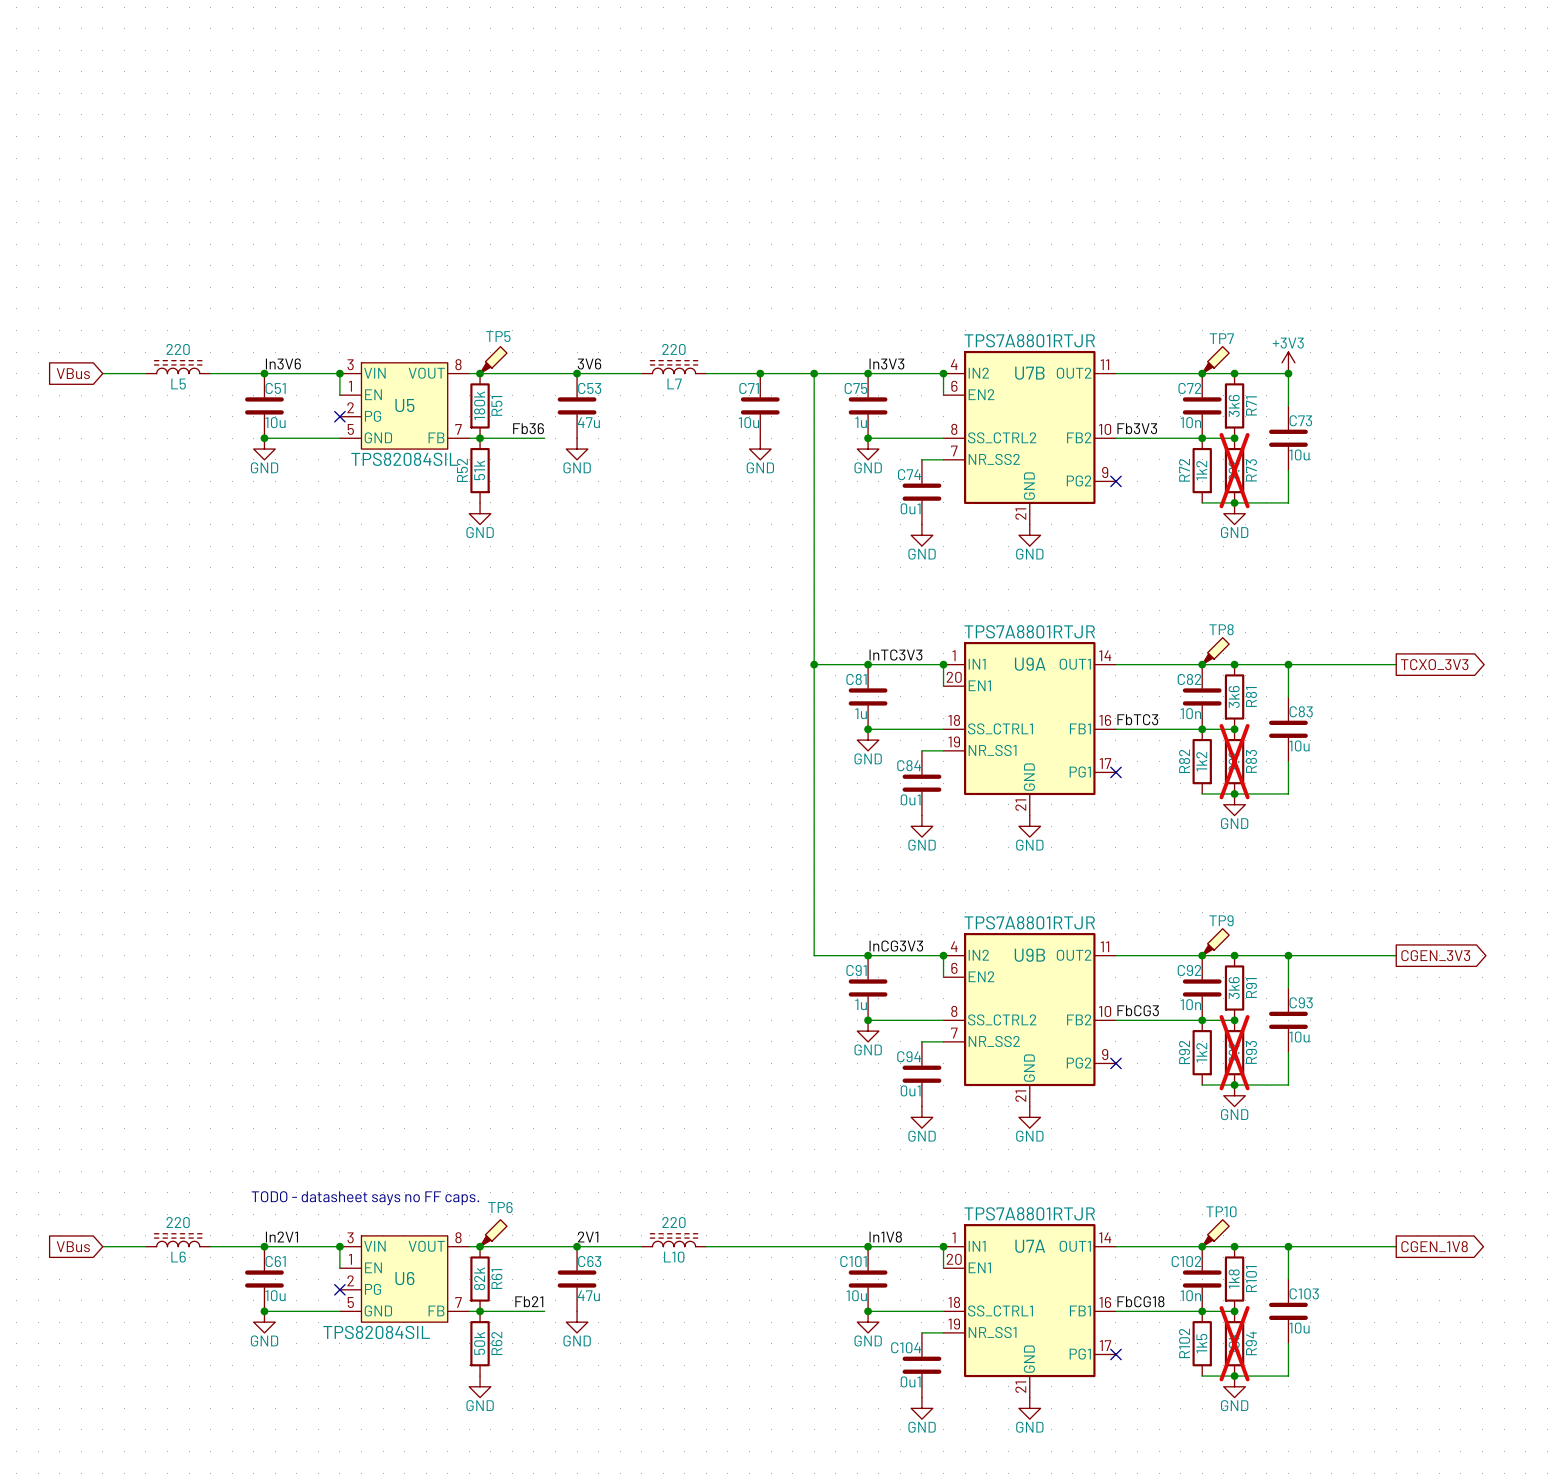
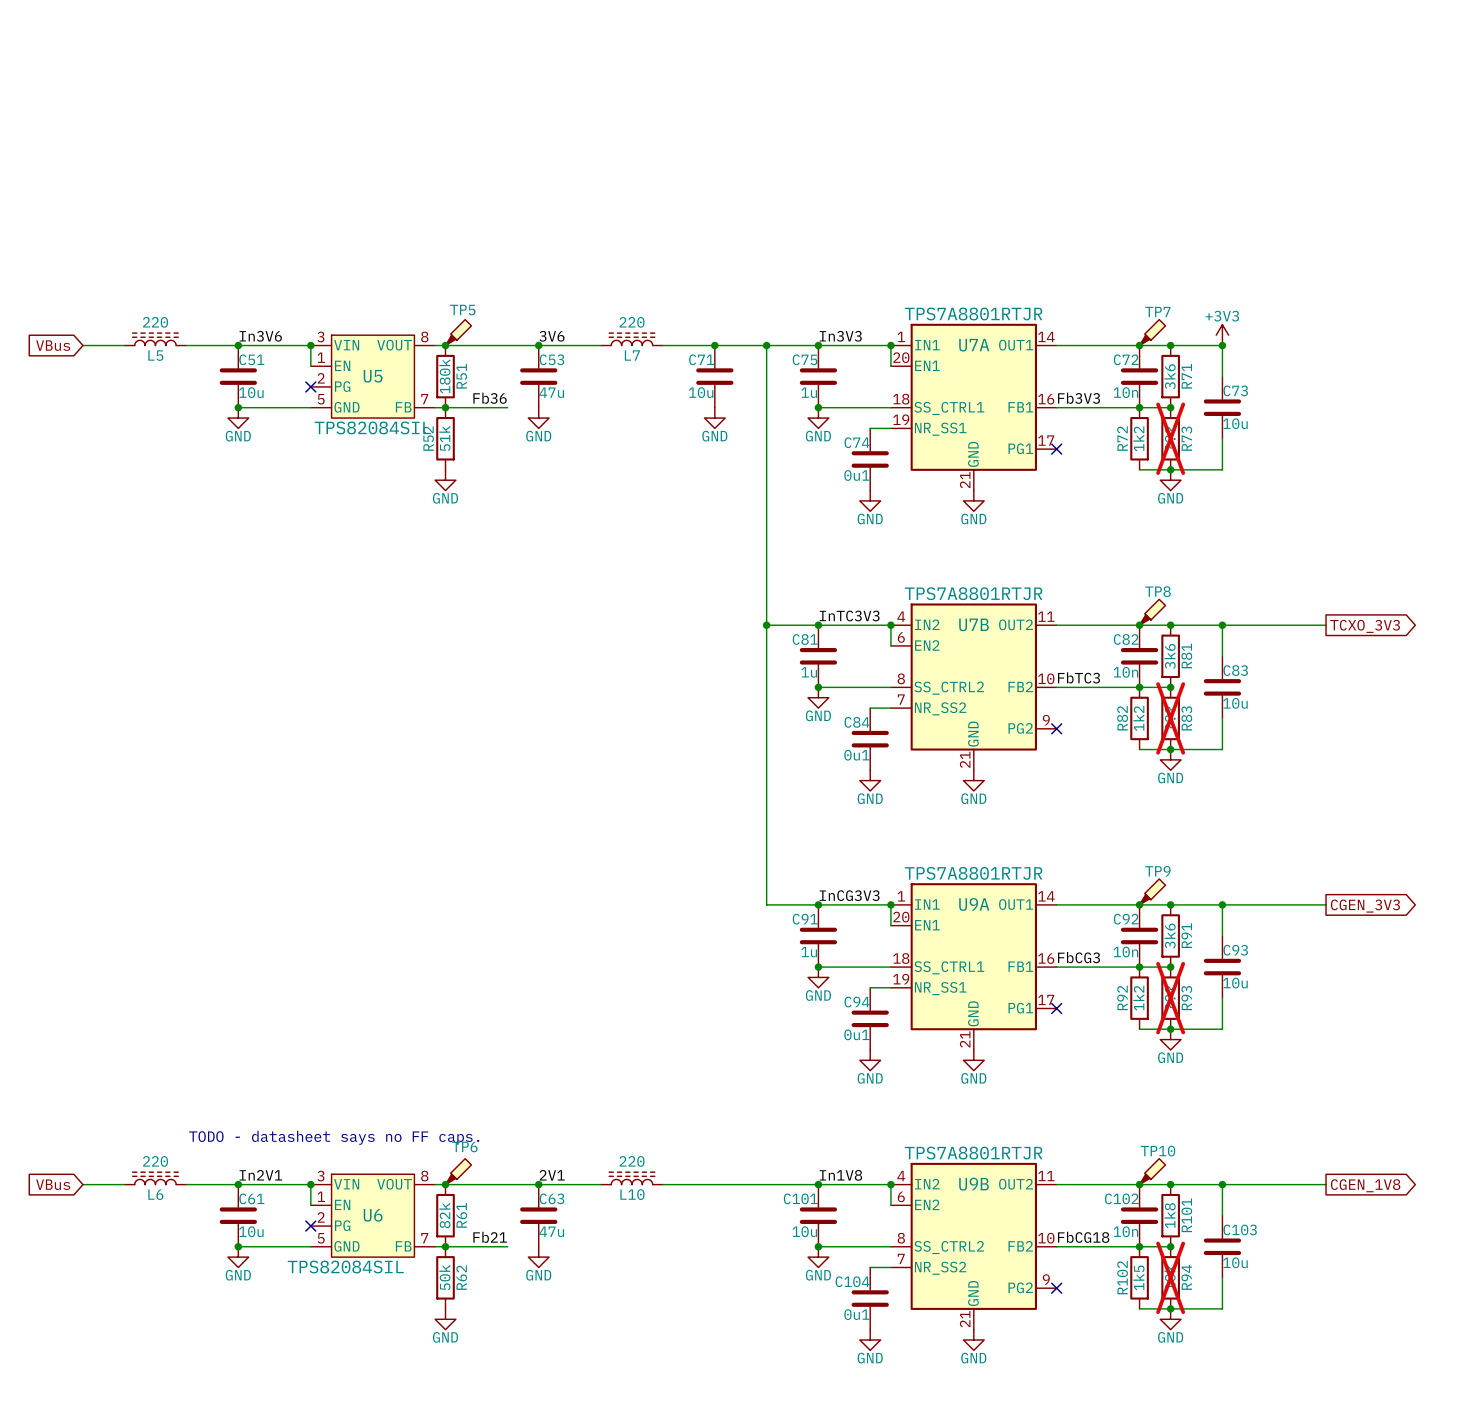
U7B position: (1029, 437) -> (973, 686)
U9A position: (1029, 728) -> (973, 966)
U9B position: (1029, 1019) -> (973, 1246)
U7A position: (1029, 1310) -> (973, 407)

